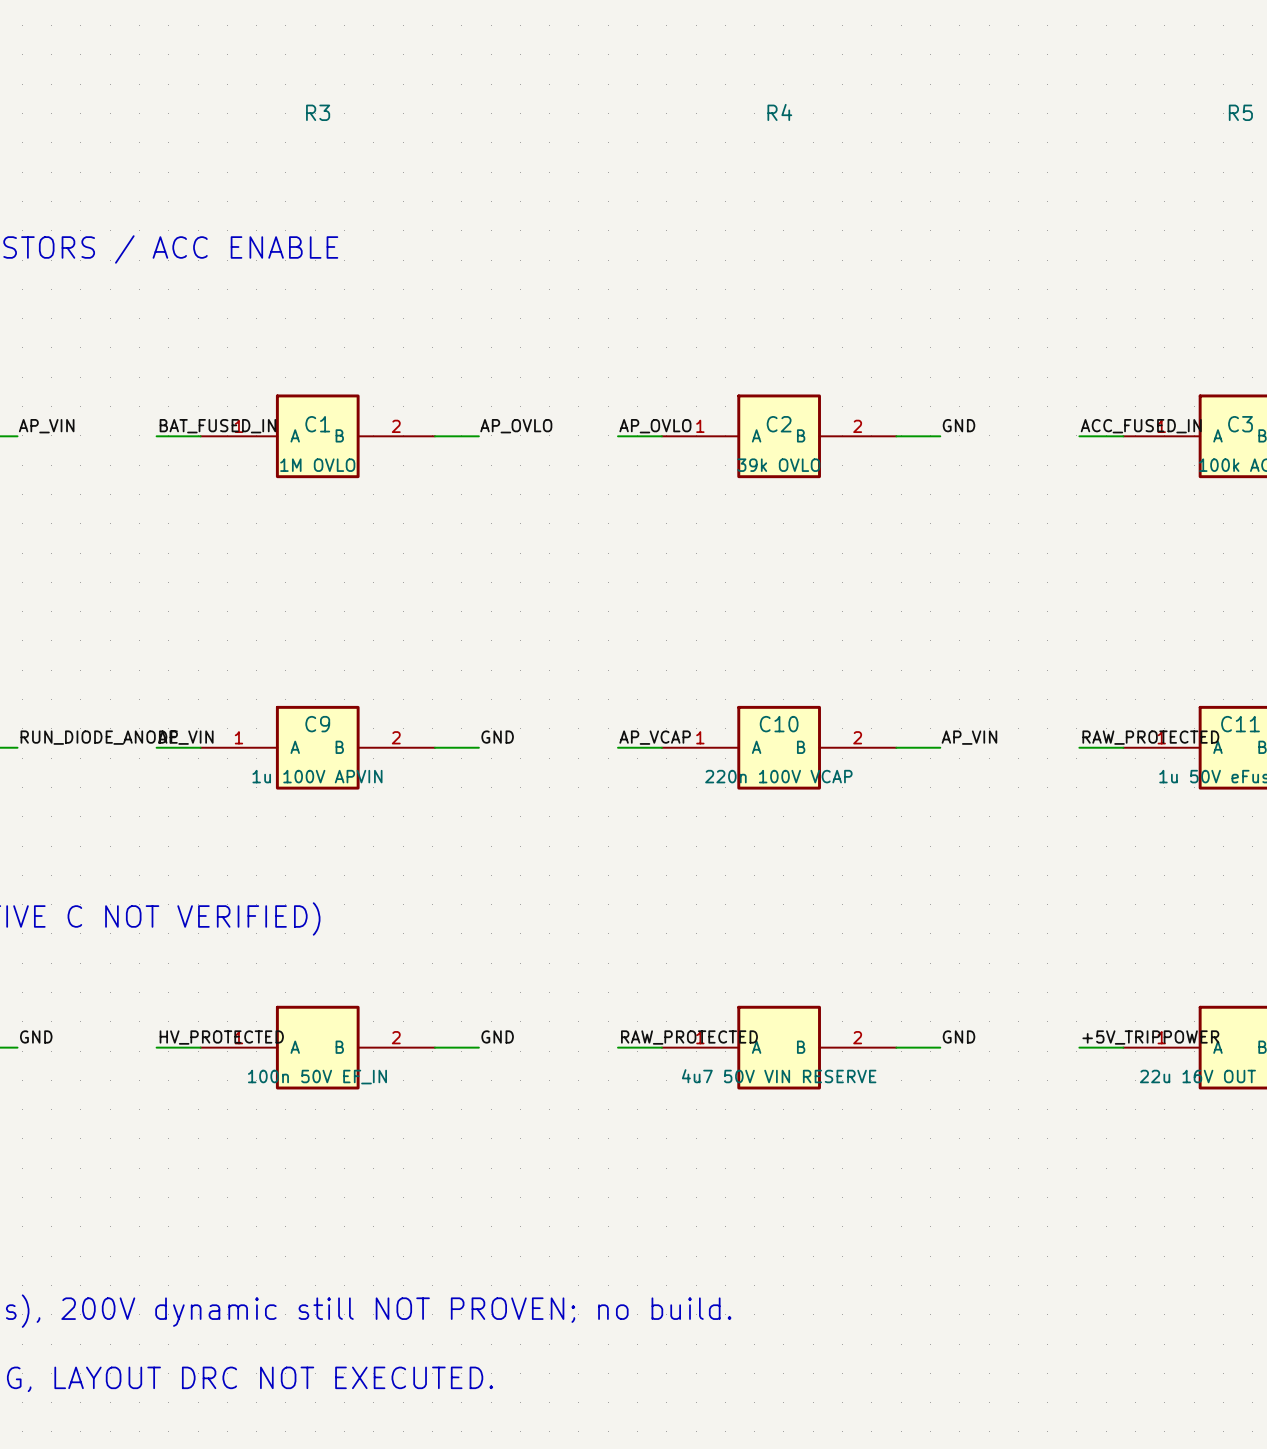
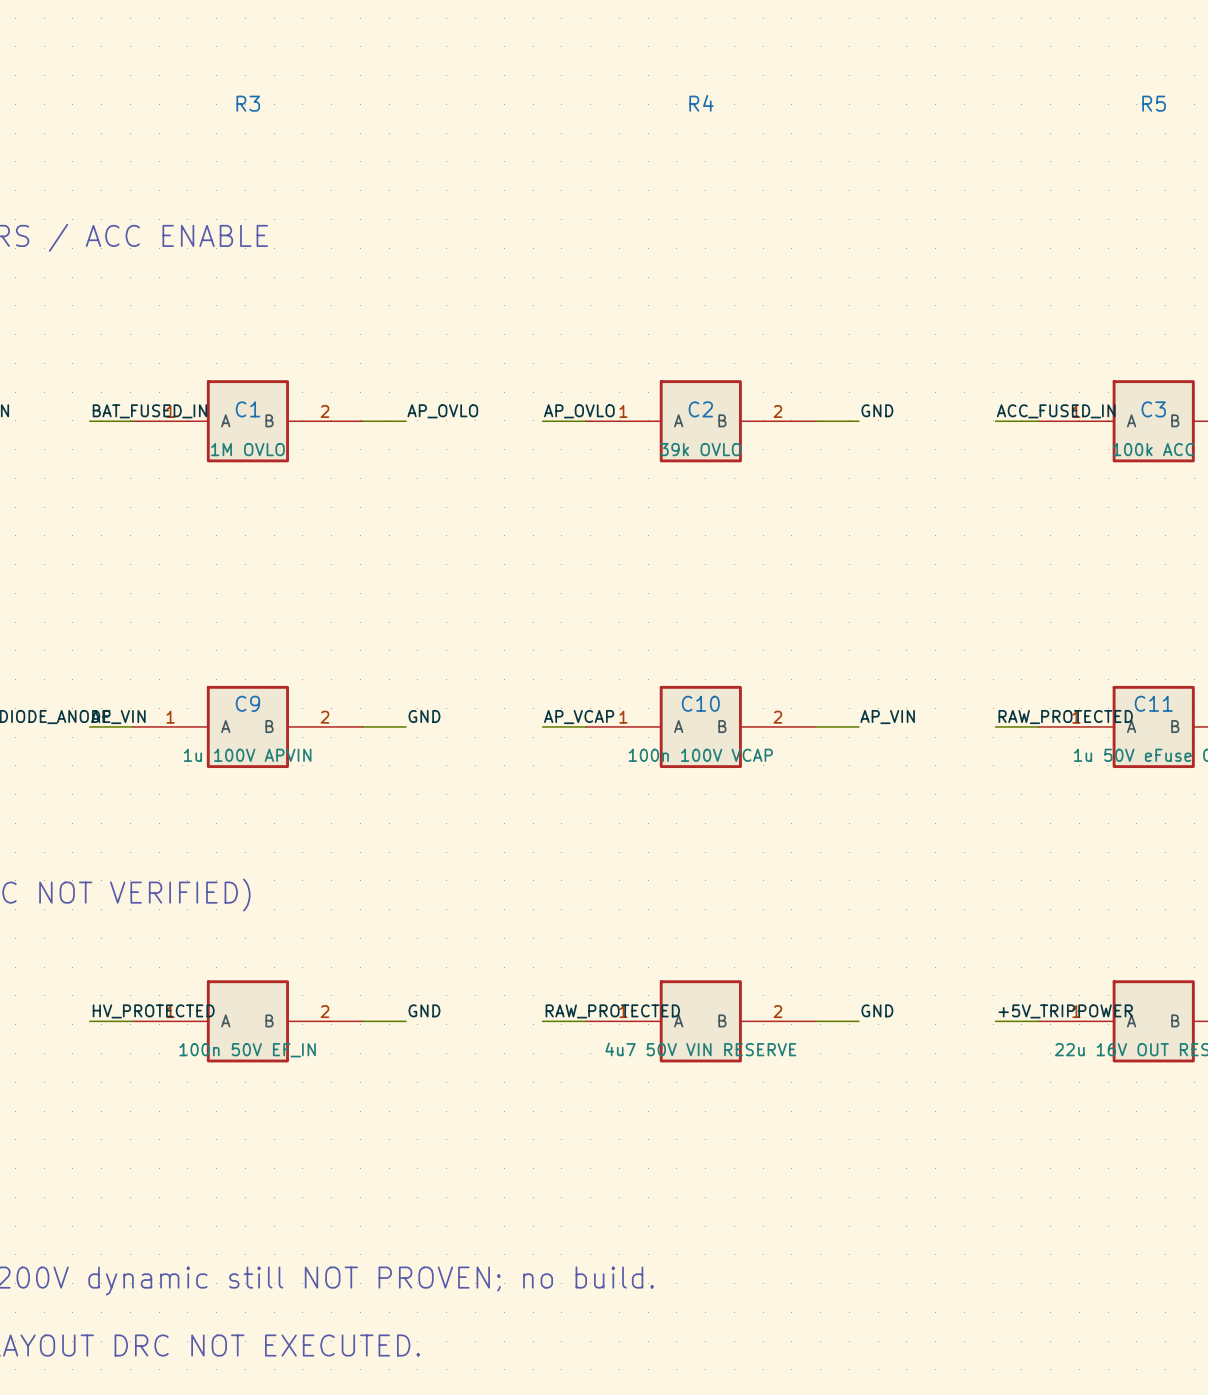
C2 value: 220n 100V VCAP (778, 776) -> 100n 100V VCAP (700, 755)

